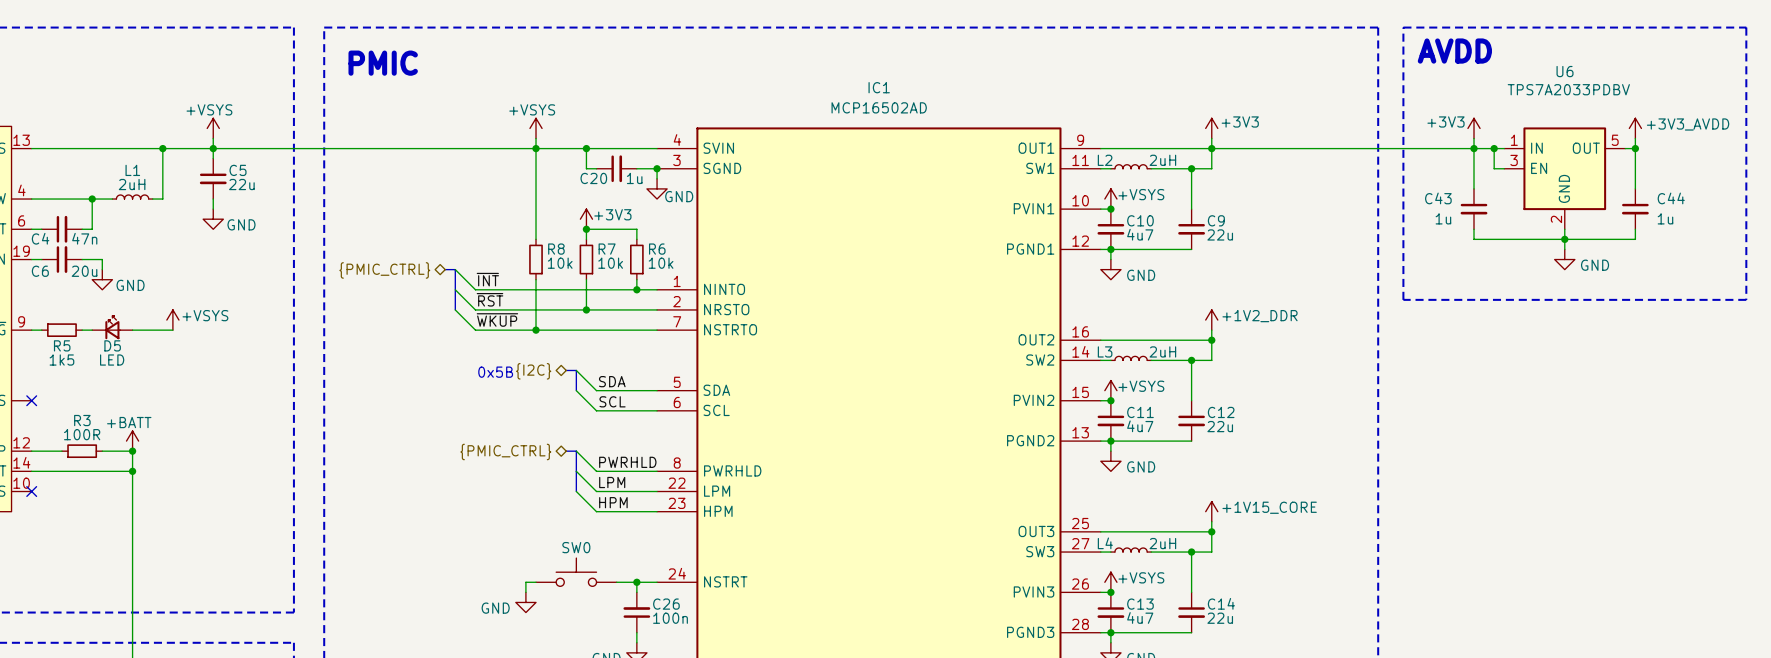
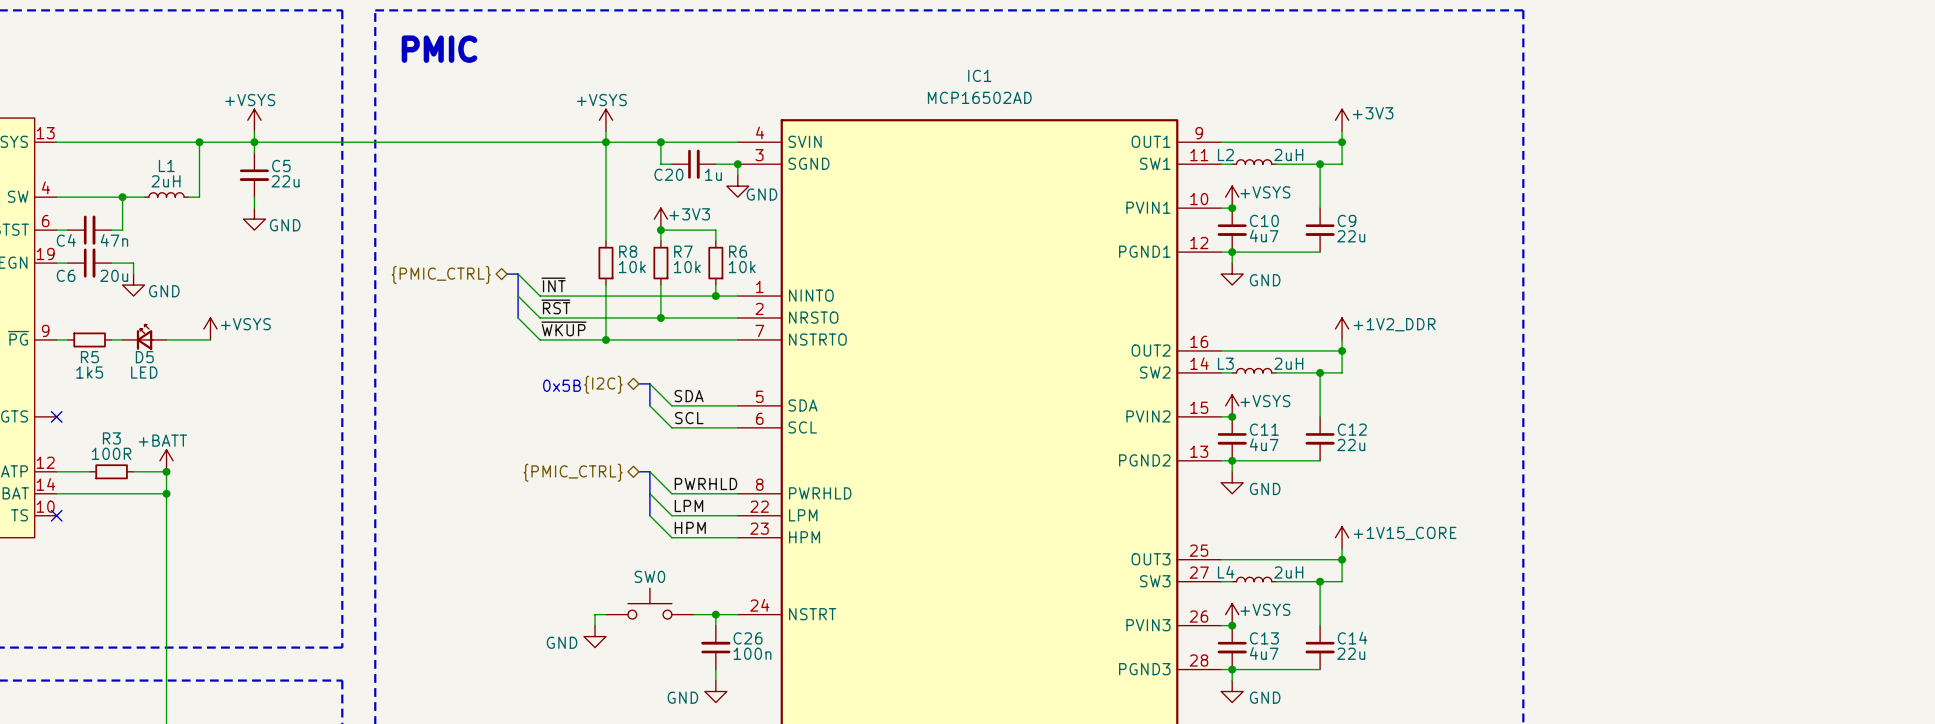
line: (1403, 27) (1746, 27) (1746, 299) (1403, 299) (1403, 27) -> none
text: AVDD (1454, 51) -> none
power symbol: +3V3 (1474, 128) -> none
power symbol: +3V3_AVDD (1635, 128) -> none
wire: (1474, 138) (1474, 188) -> none
wire: (1635, 138) (1635, 188) -> none
wire: (1211, 148) (1504, 148) -> none
junction: (1474, 148) -> none
wire: (1494, 148) (1494, 168) (1504, 168) -> none
junction: (1494, 148) -> none
wire: (1625, 148) (1635, 148) -> none
junction: (1635, 148) -> none
U6: TPS7A2033PDBV (1564, 178) -> none
C43: 1u (1474, 209) -> none
C44: 1u (1635, 209) -> none
wire: (1474, 229) (1474, 239) (1635, 239) (1635, 229) -> none
wire: (1564, 229) (1564, 249) -> none
junction: (1564, 239) -> none
power symbol: GND (1564, 259) -> none

